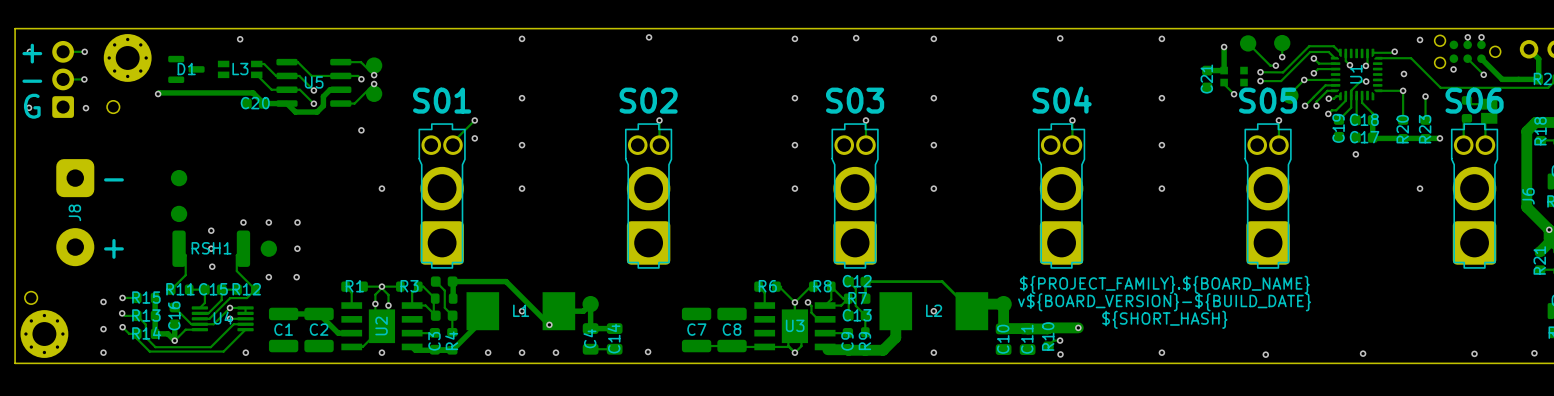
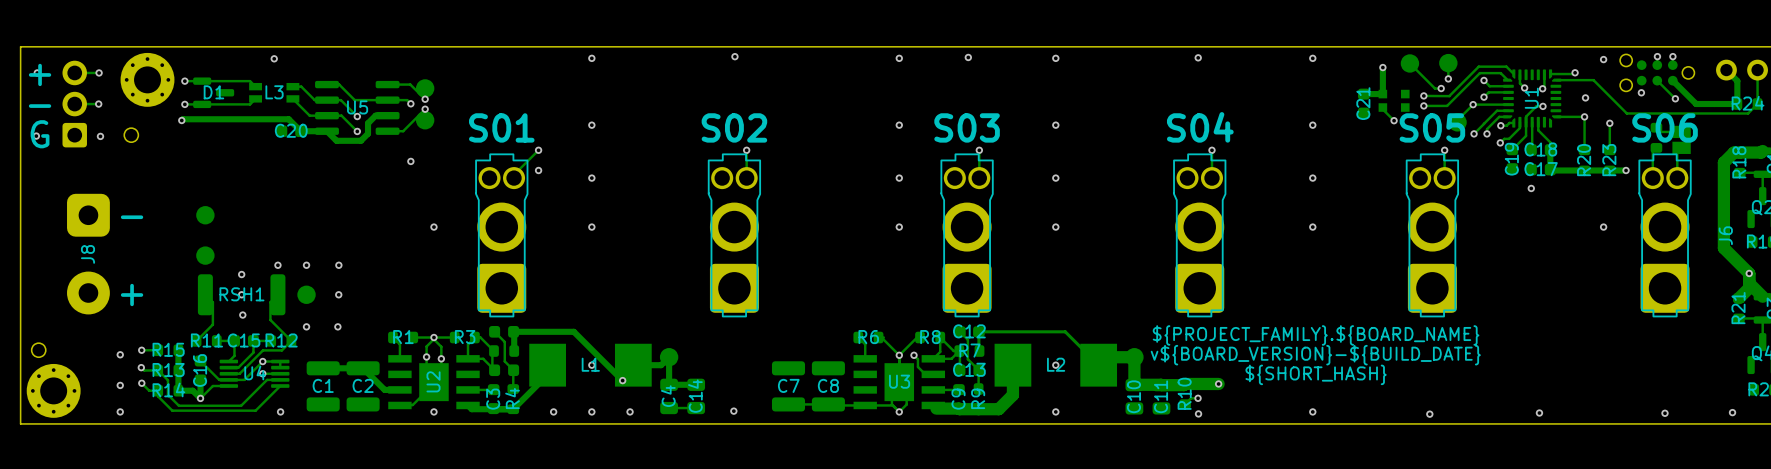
bottom track: none -> (184, 81) (250, 81) (255, 86)
via: none -> (184, 81)
bottom track: none -> (255, 98) (250, 104) (184, 104)
via: none -> (184, 104)

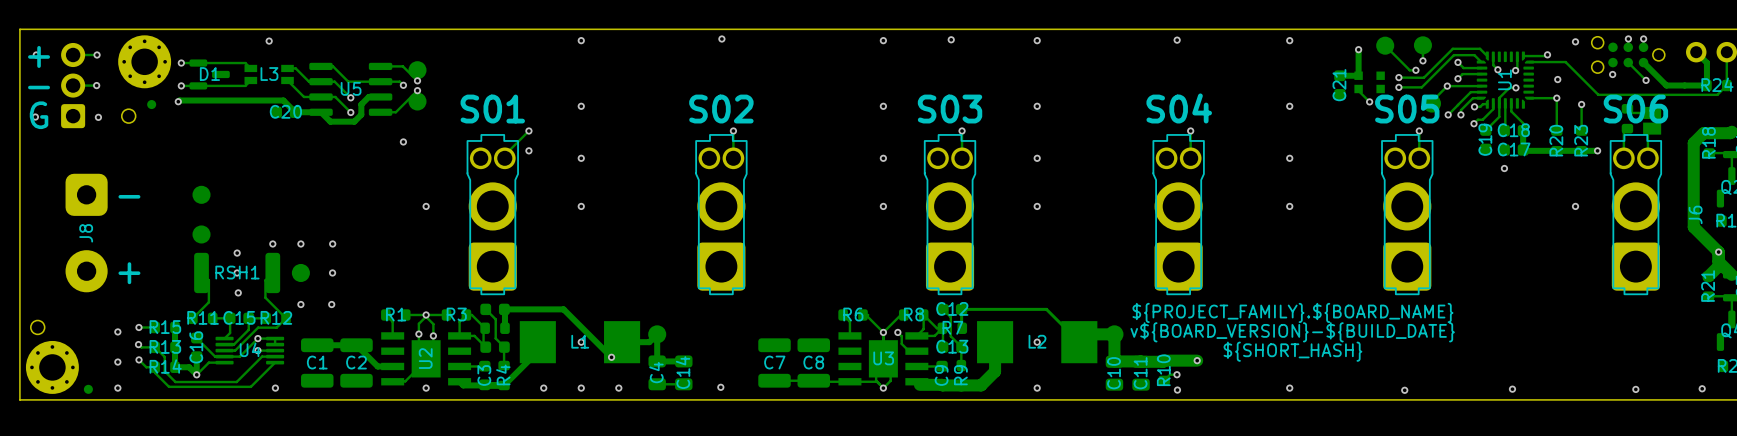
part: none -> (151, 104)
part: none -> (88, 389)

